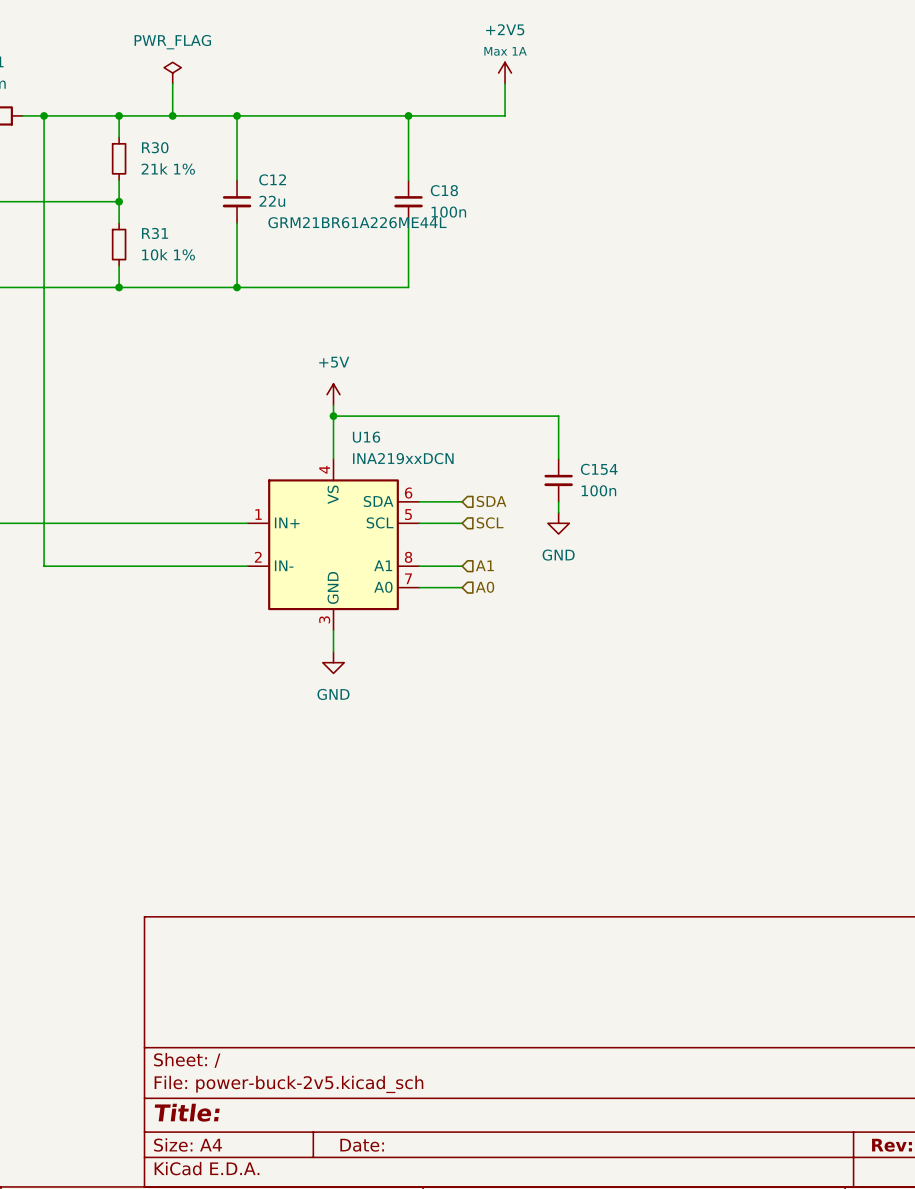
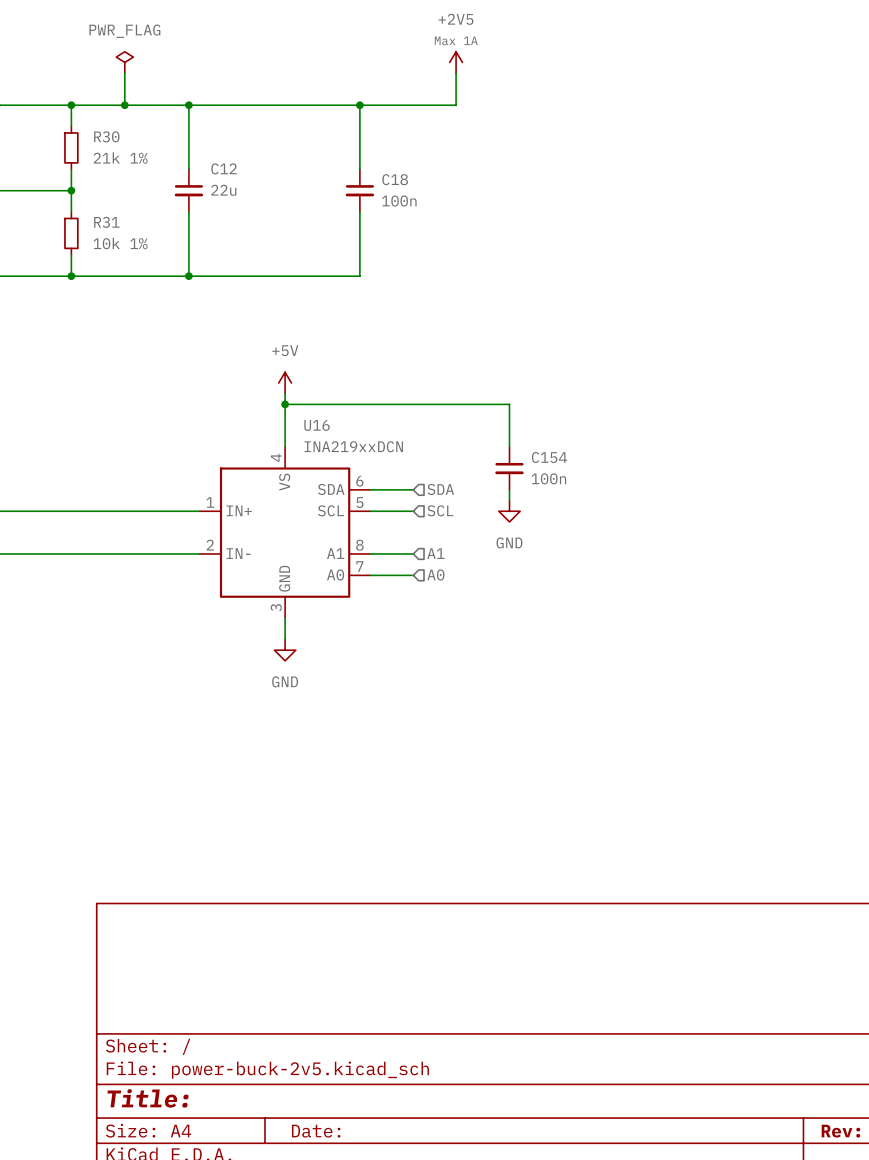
C12 text: GRM21BR61A226ME44L (357, 222) -> none

